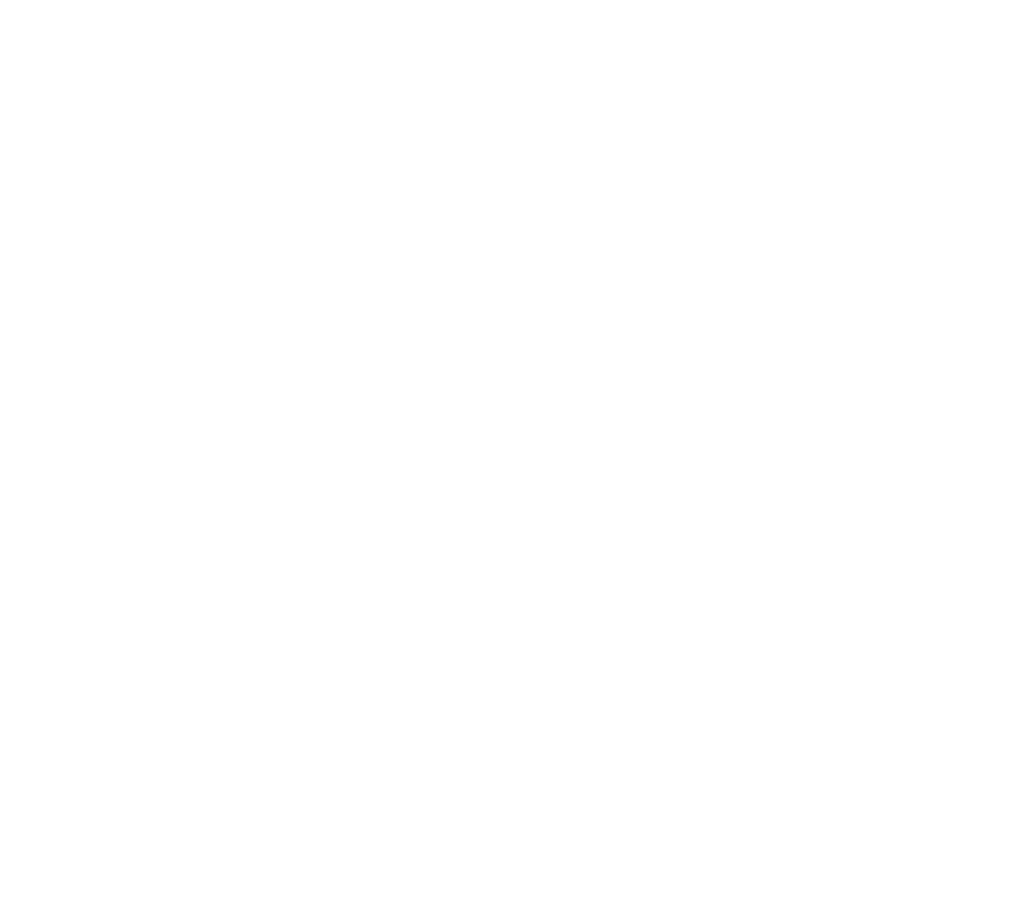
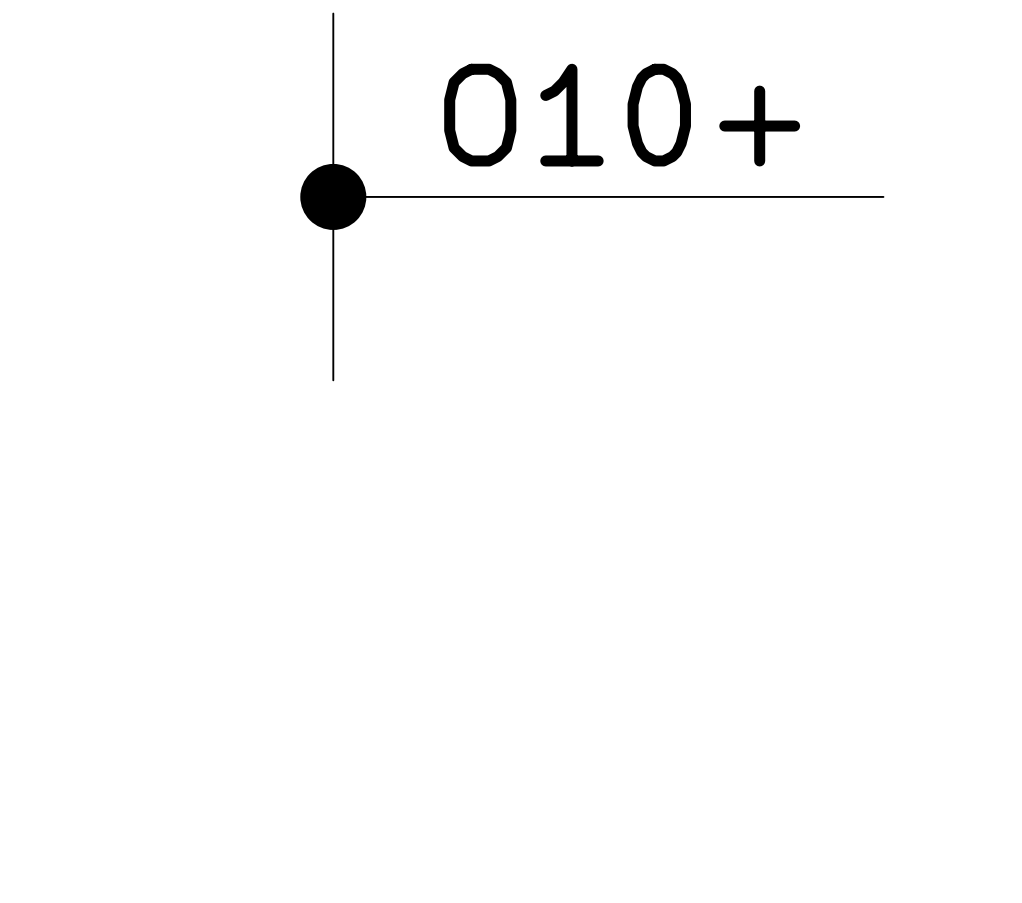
wire: none -> (333, 13) (333, 380)
label: none -> O10+ (622, 115)
wire: none -> (333, 196) (883, 196)
junction: none -> (333, 196)

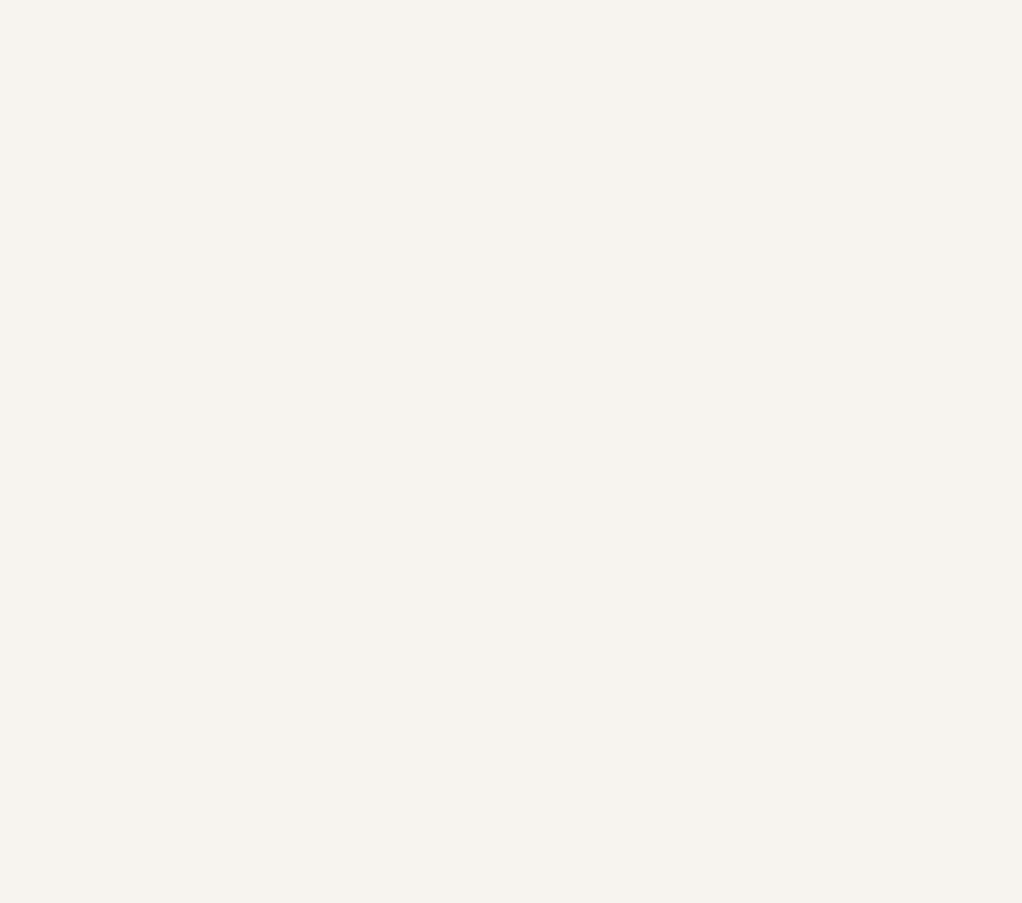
wire: (333, 13) (333, 380) -> none
label: O10+ (622, 115) -> none
wire: (333, 196) (883, 196) -> none
junction: (333, 196) -> none

